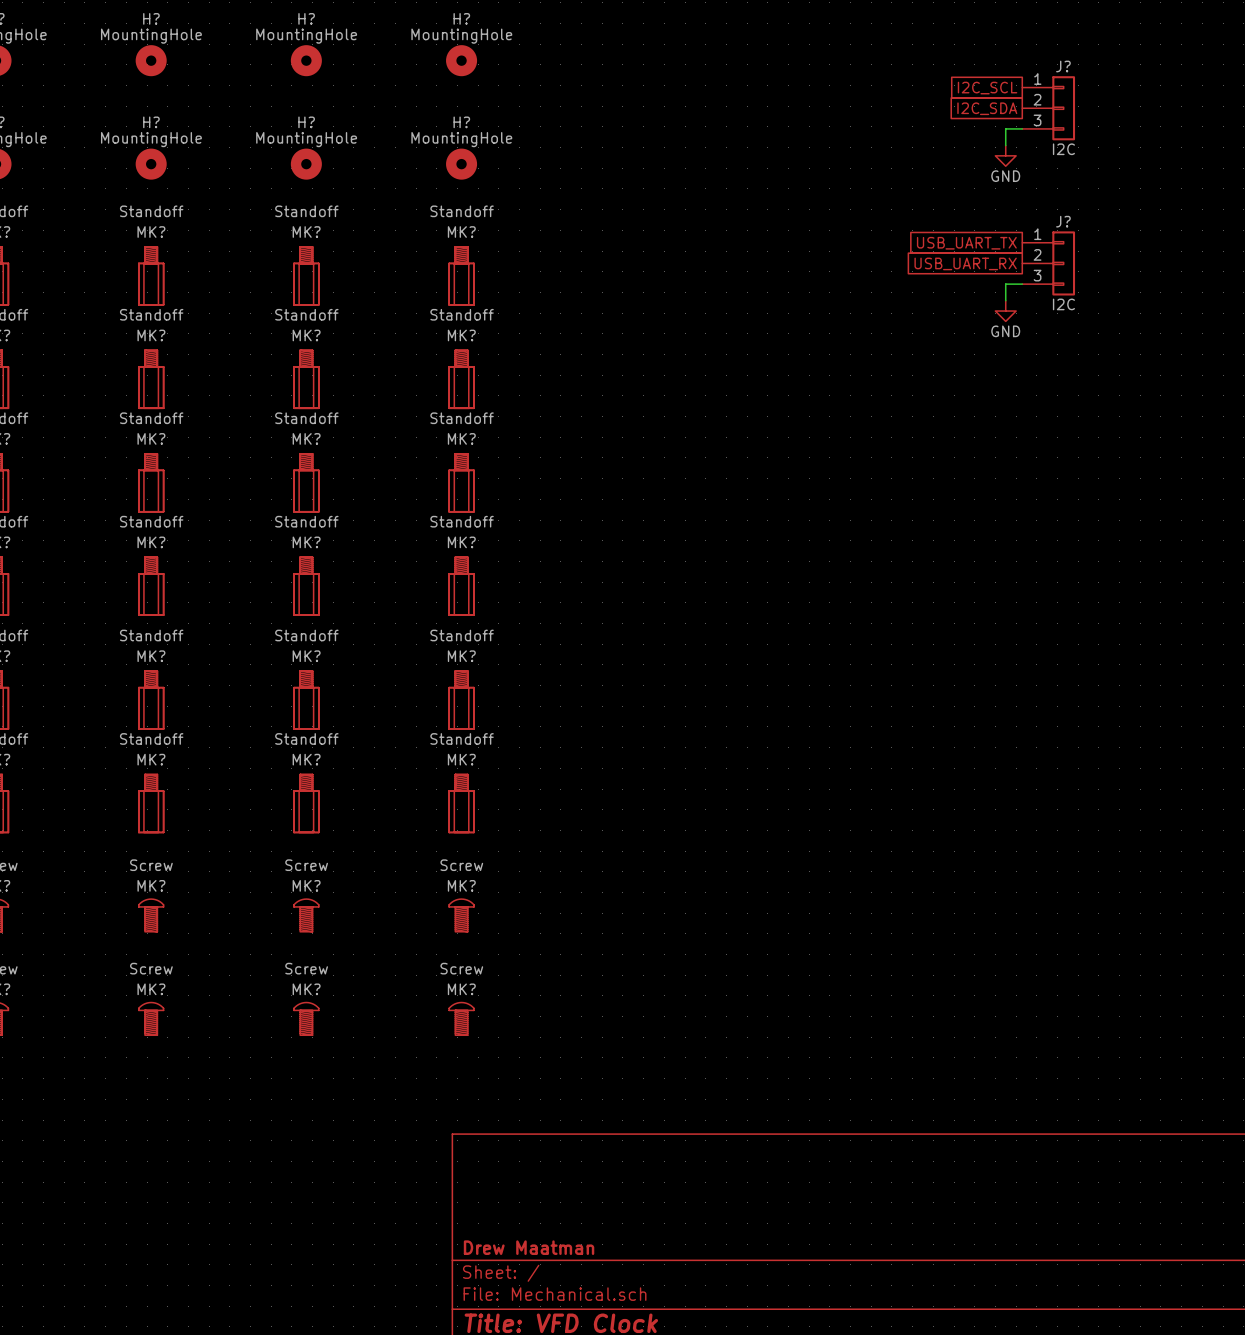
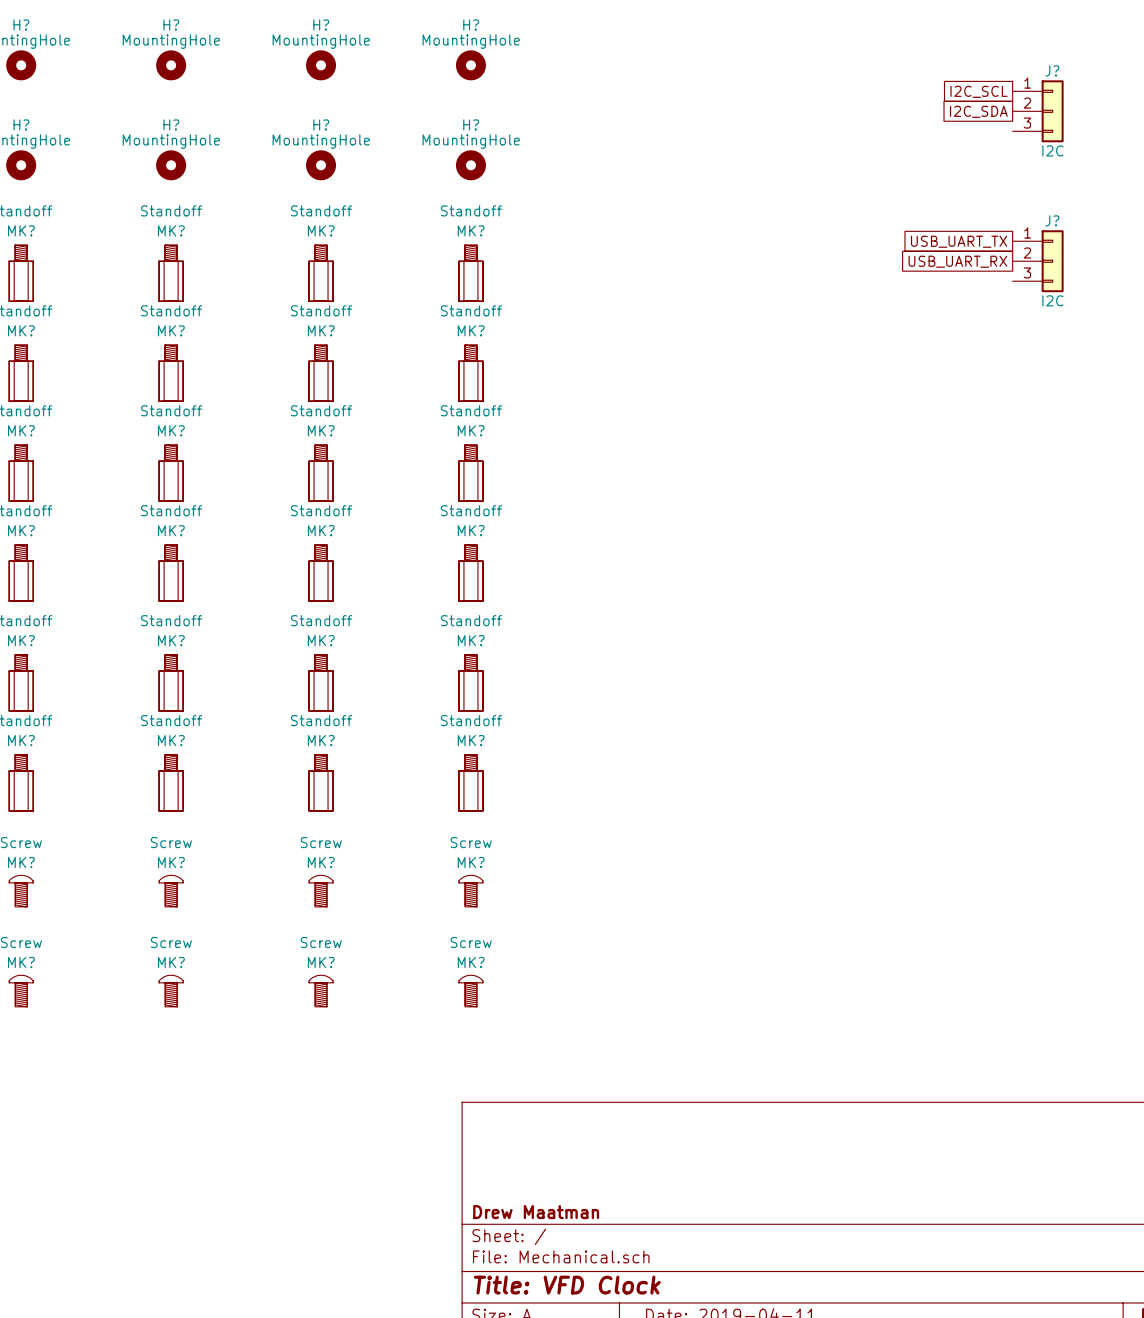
wire: (1022, 128) (1005, 128) (1005, 145) -> none
power symbol: GND (1005, 155) -> none
wire: (1022, 284) (1005, 284) (1005, 300) -> none
power symbol: GND (1005, 311) -> none

